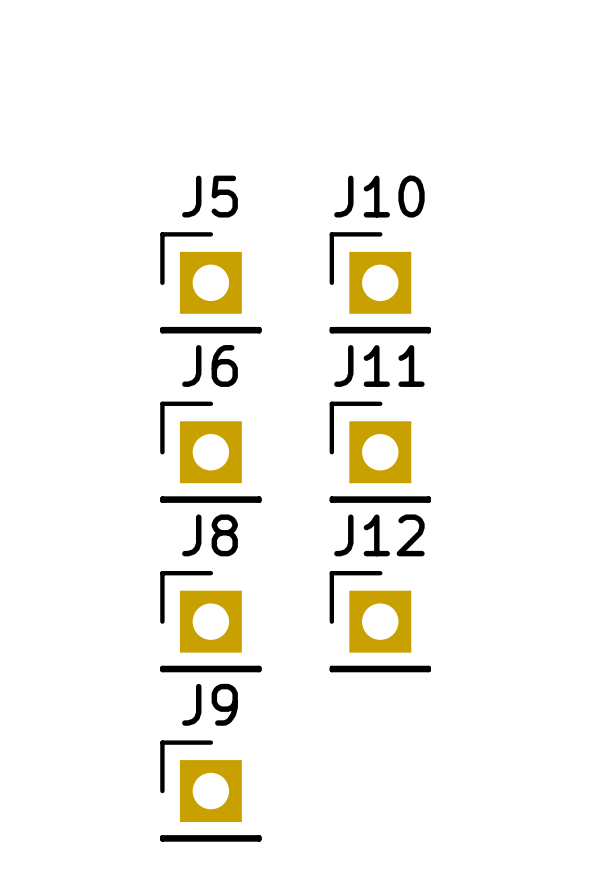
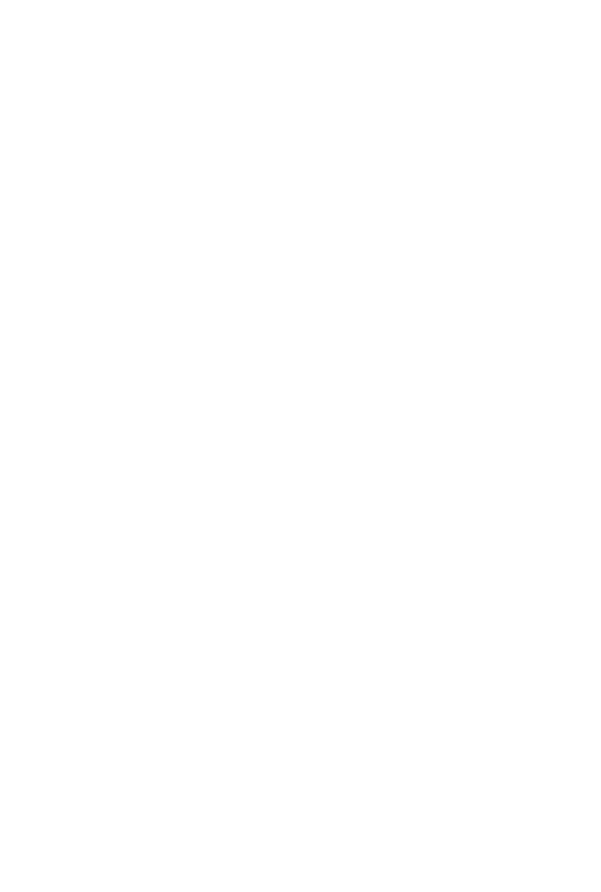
J5: (210, 282) -> none
J10: (380, 282) -> none
J6: (210, 452) -> none
J11: (380, 452) -> none
J8: (210, 621) -> none
J12: (380, 621) -> none
J9: (210, 791) -> none

